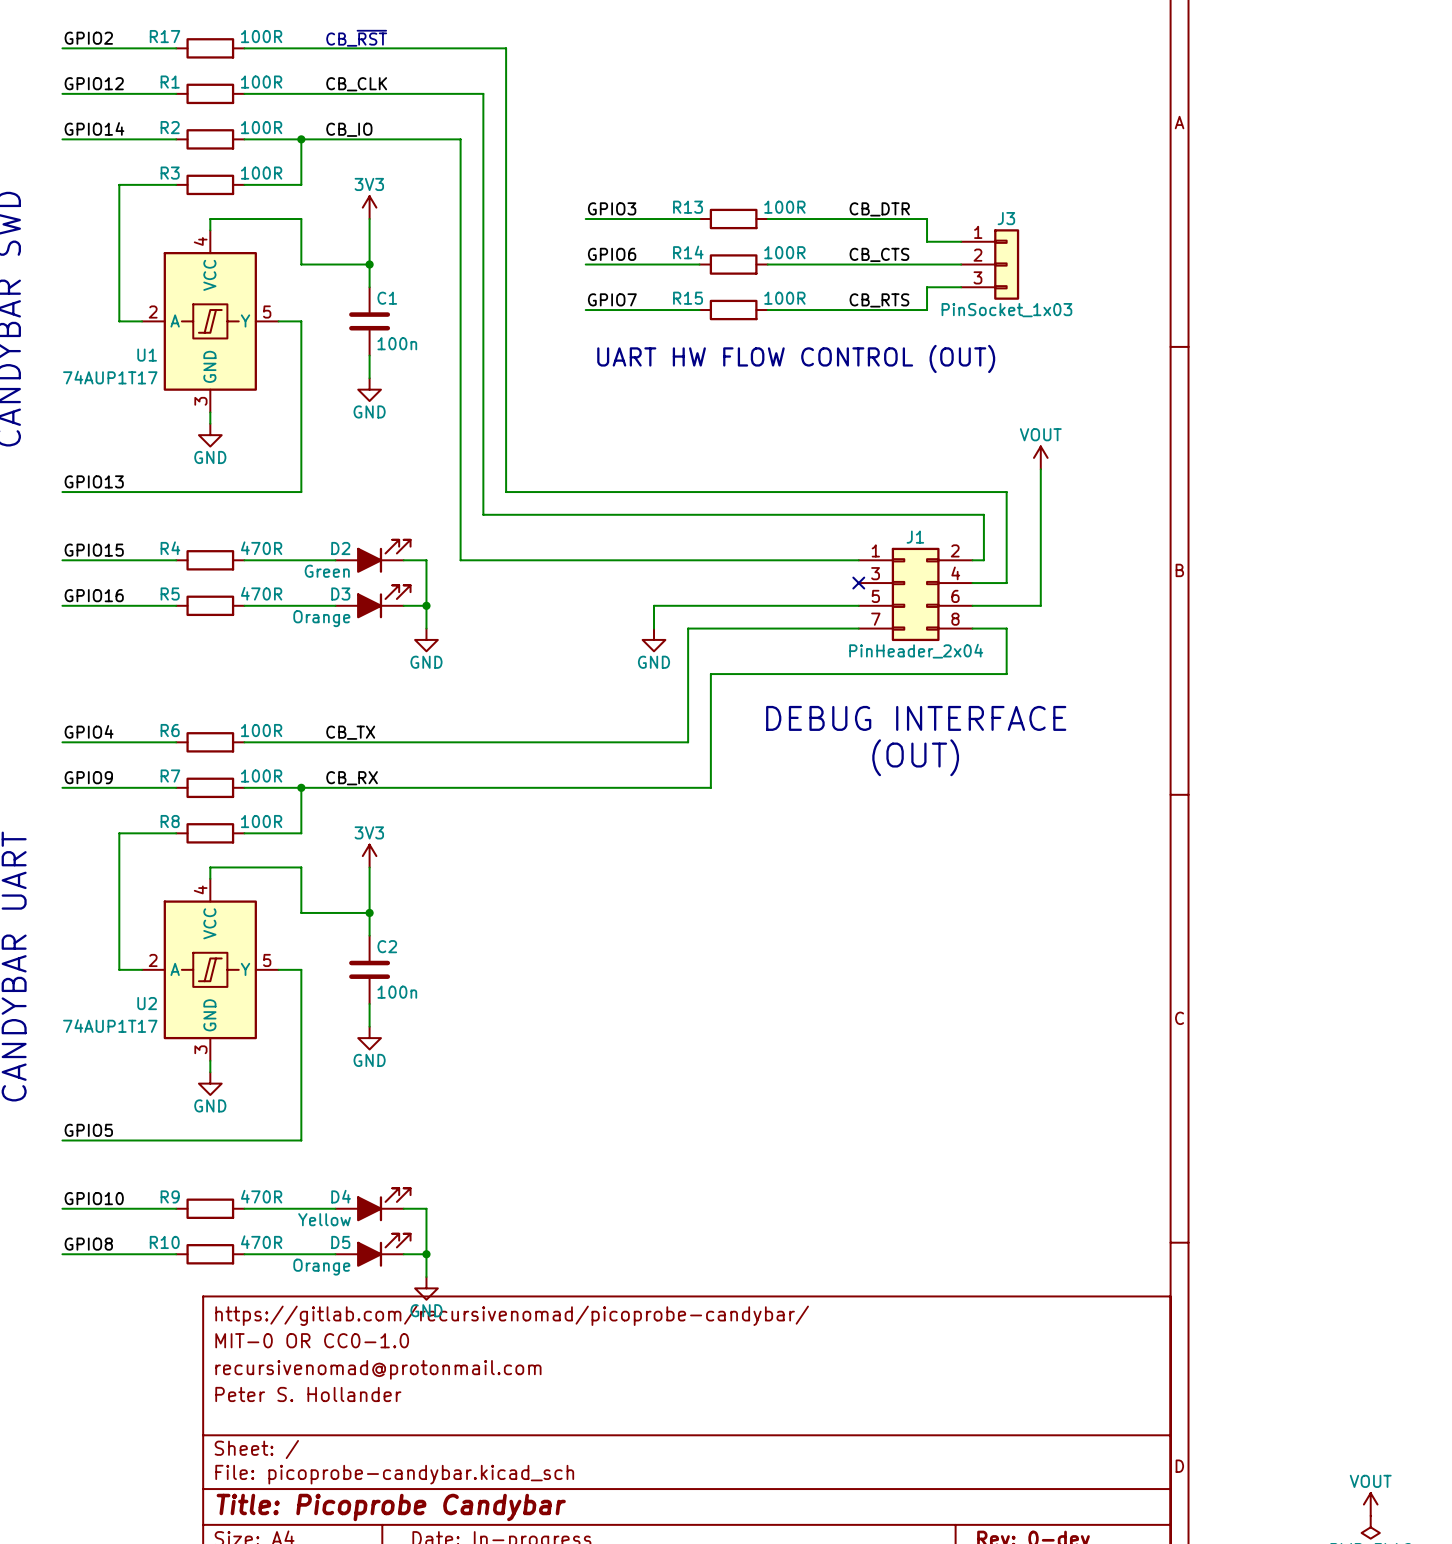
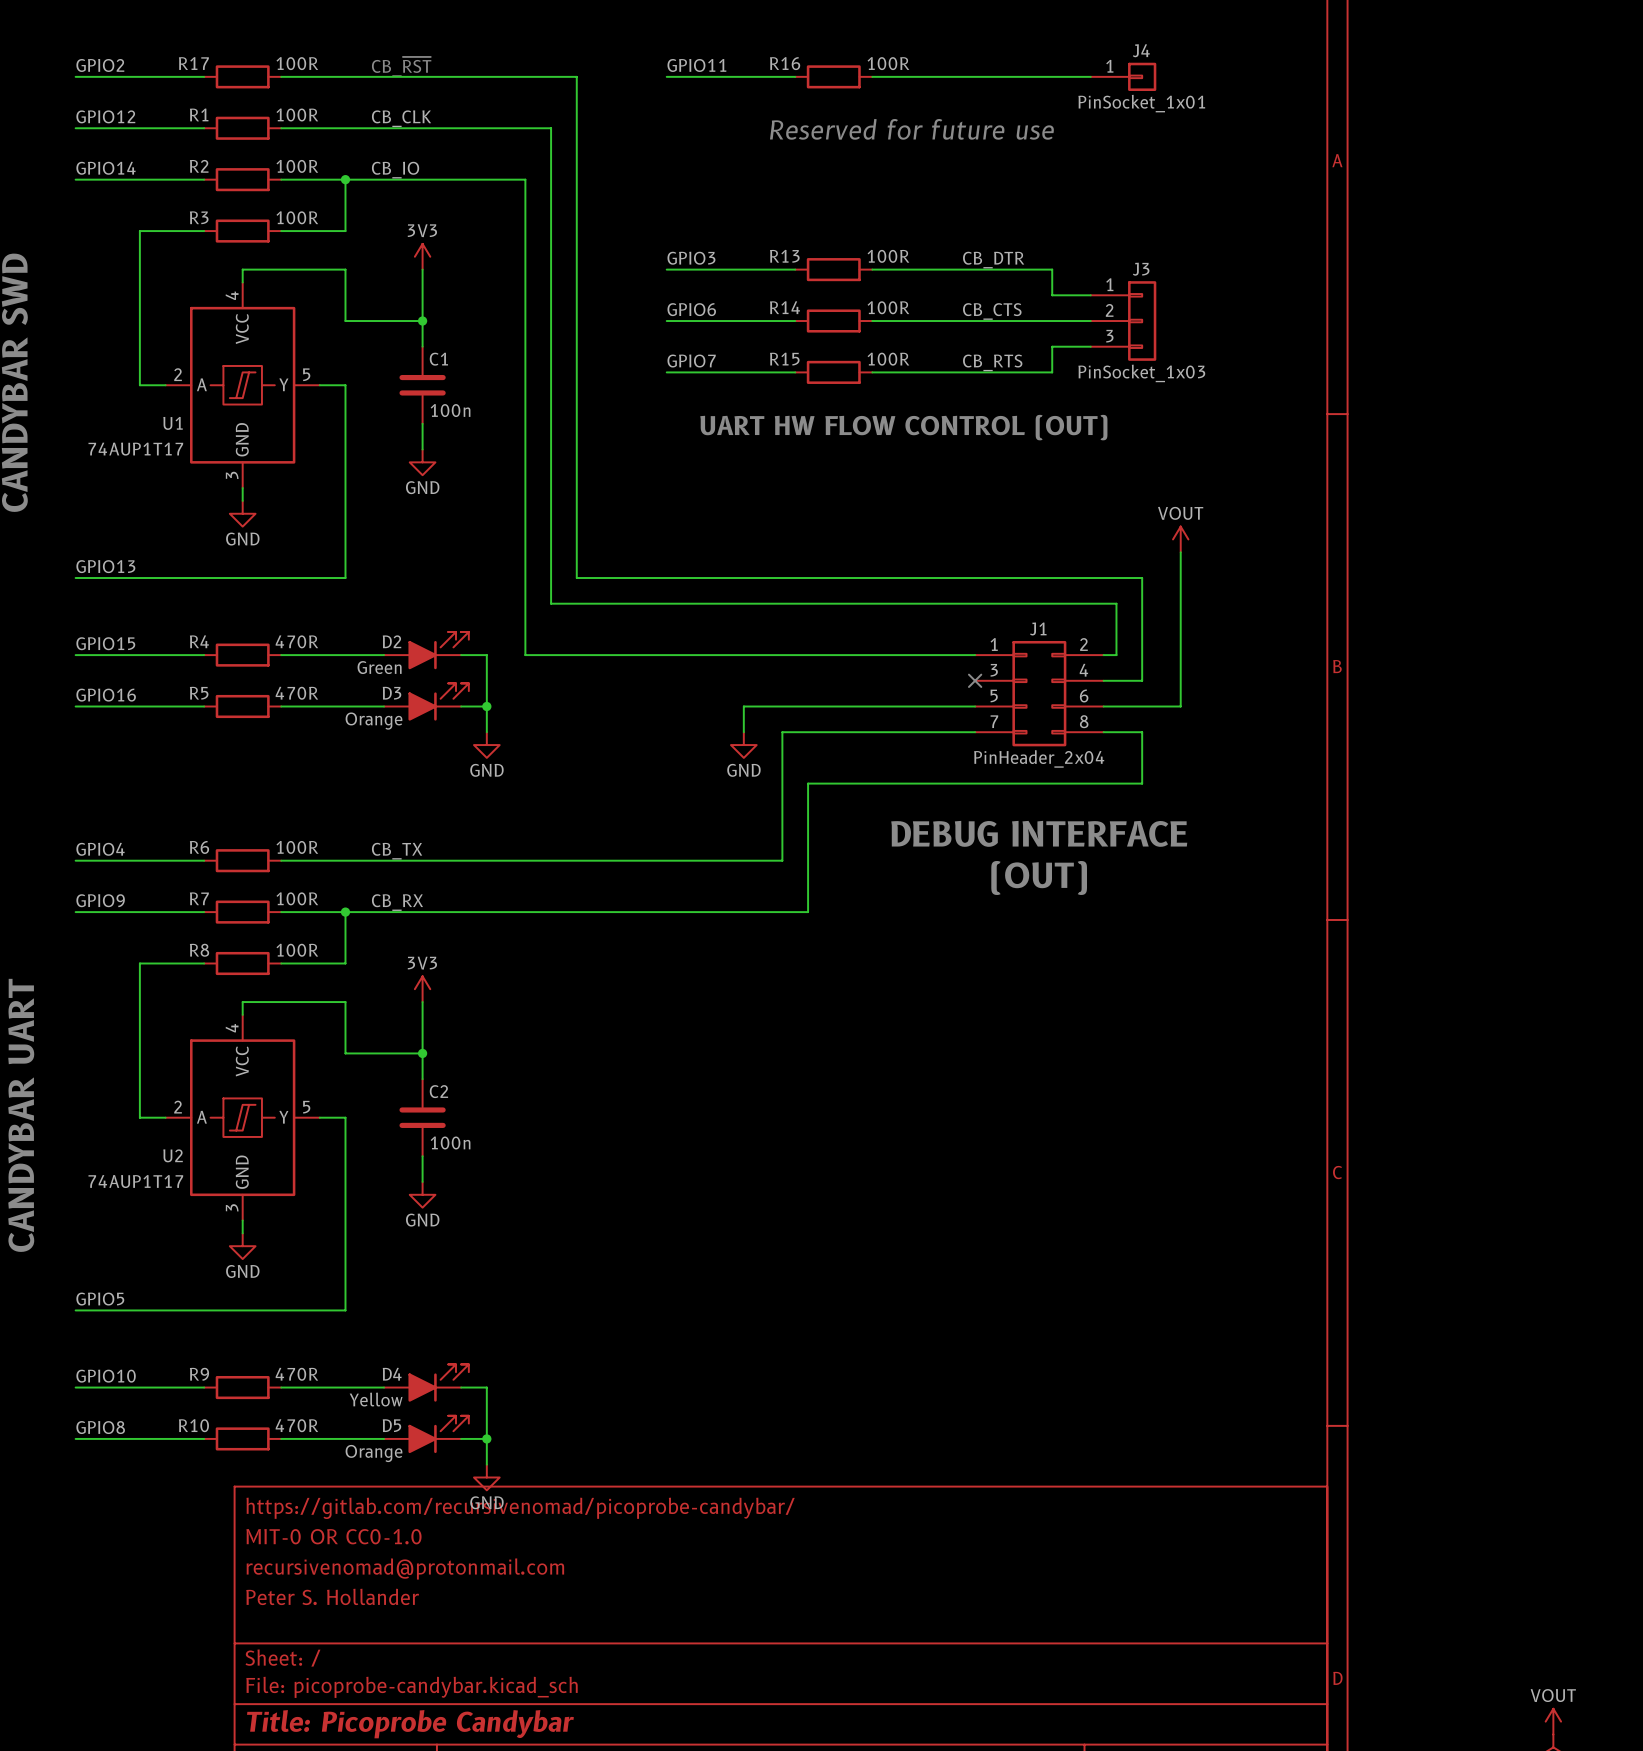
label: none -> GPIO11 (696, 65)
wire: none -> (666, 76) (795, 76)
R16: none -> 100R (833, 76)
wire: none -> (872, 76) (1090, 76)
J4: none -> PinSocket_1x01 (1123, 76)
text: none -> Reserved for future use (911, 129)

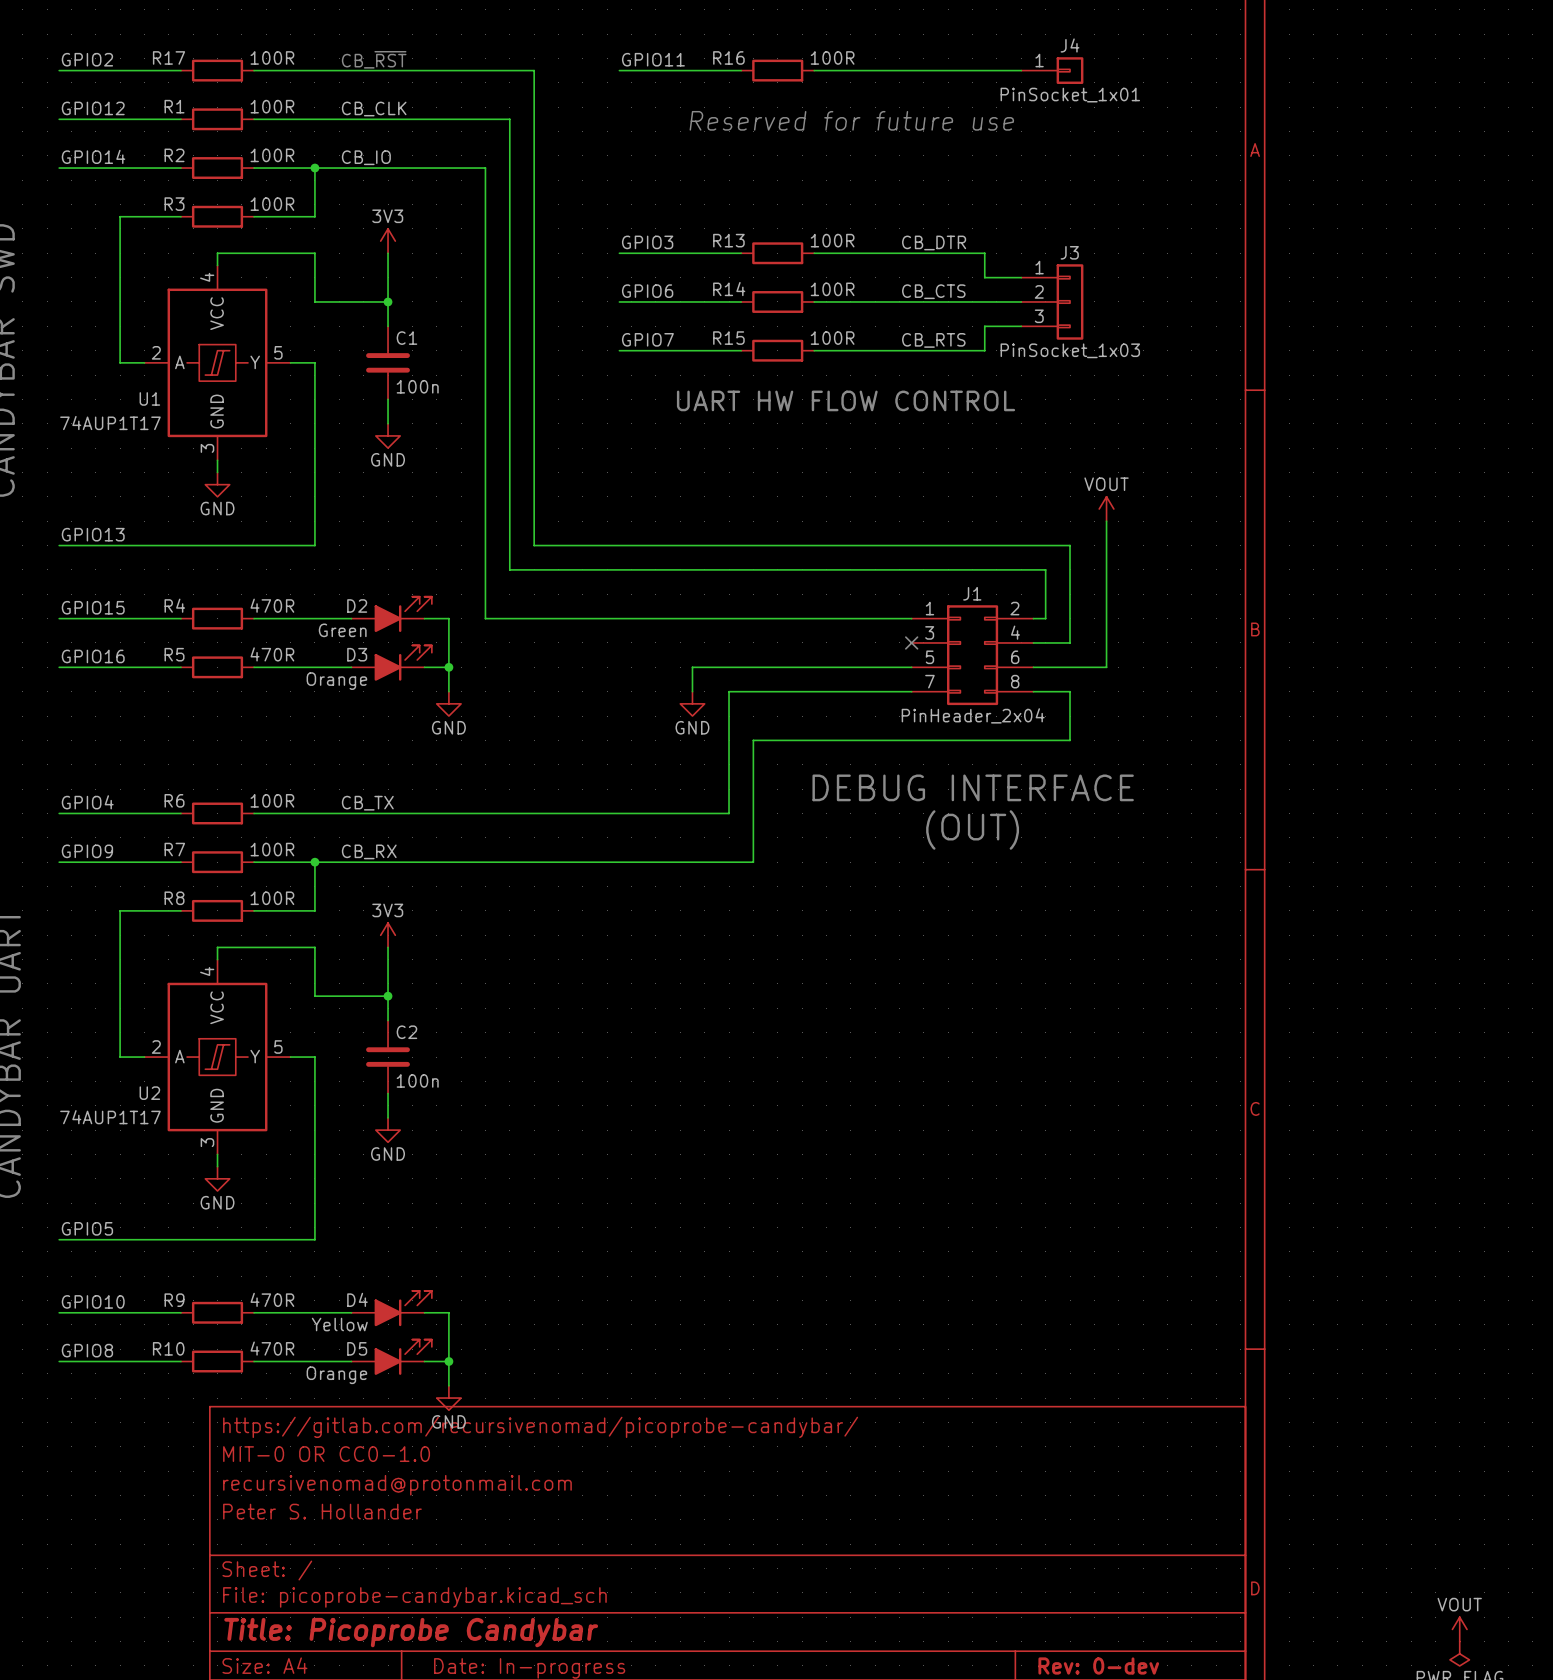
text: UART HW FLOW CONTROL (OUT) (903, 427) -> UART HW FLOW CONTROL (846, 400)

